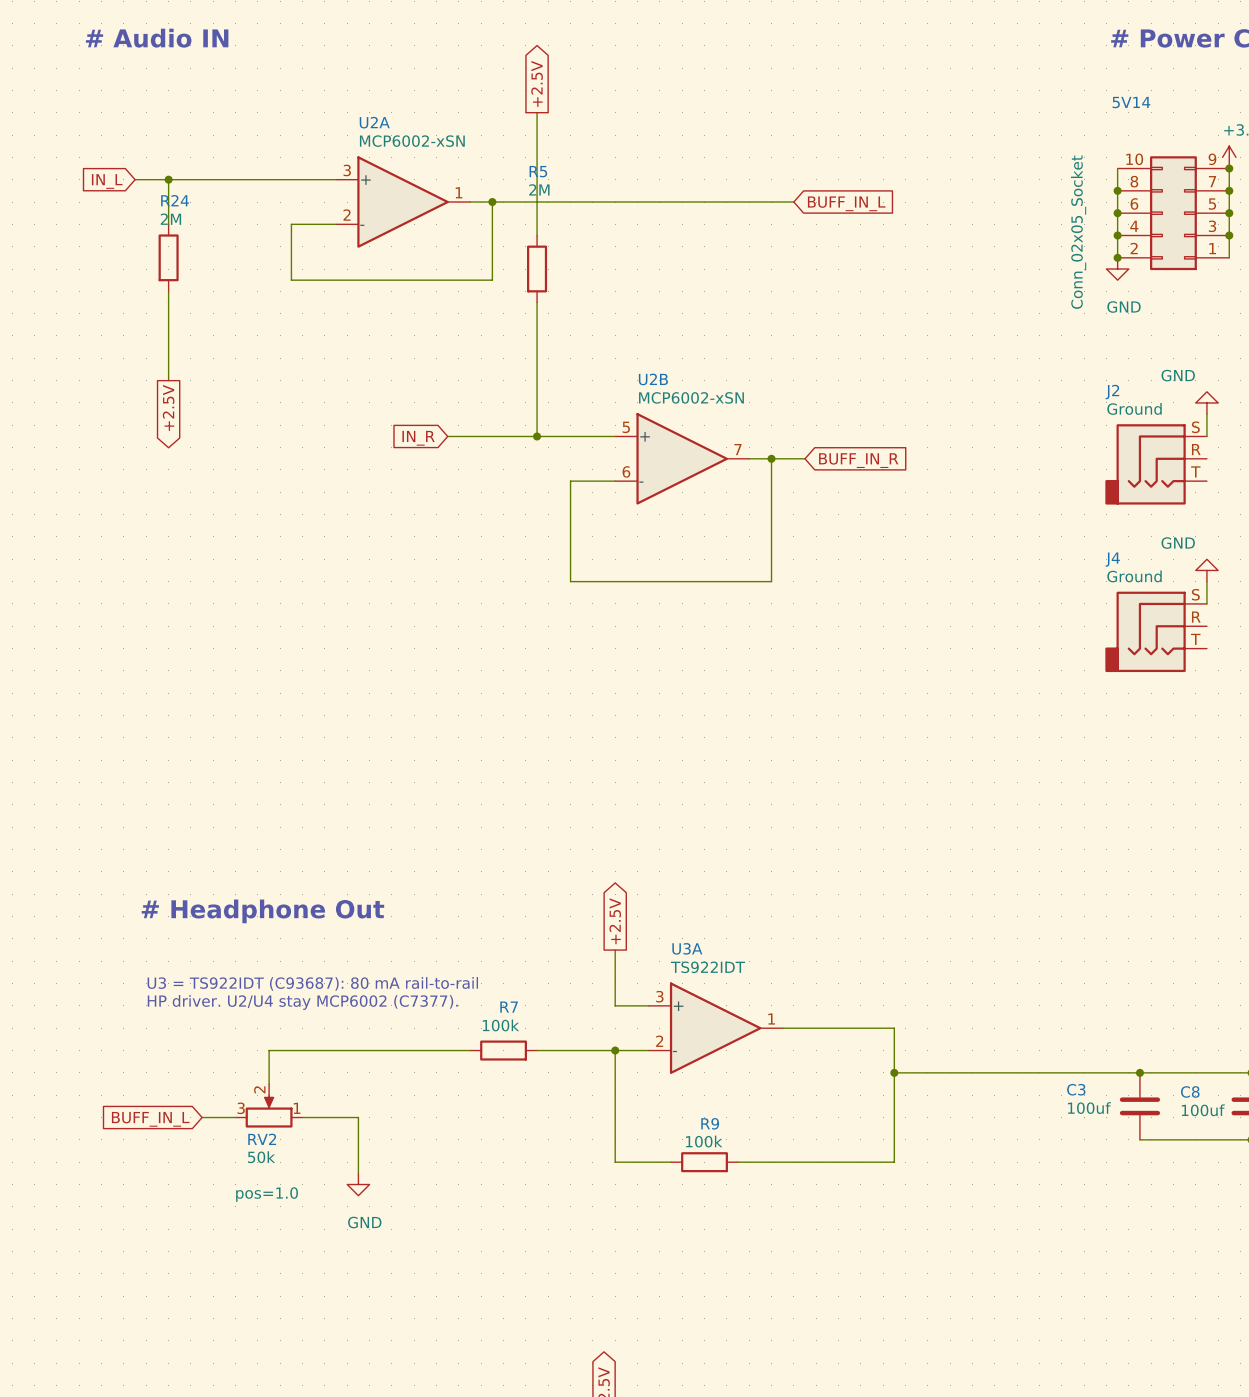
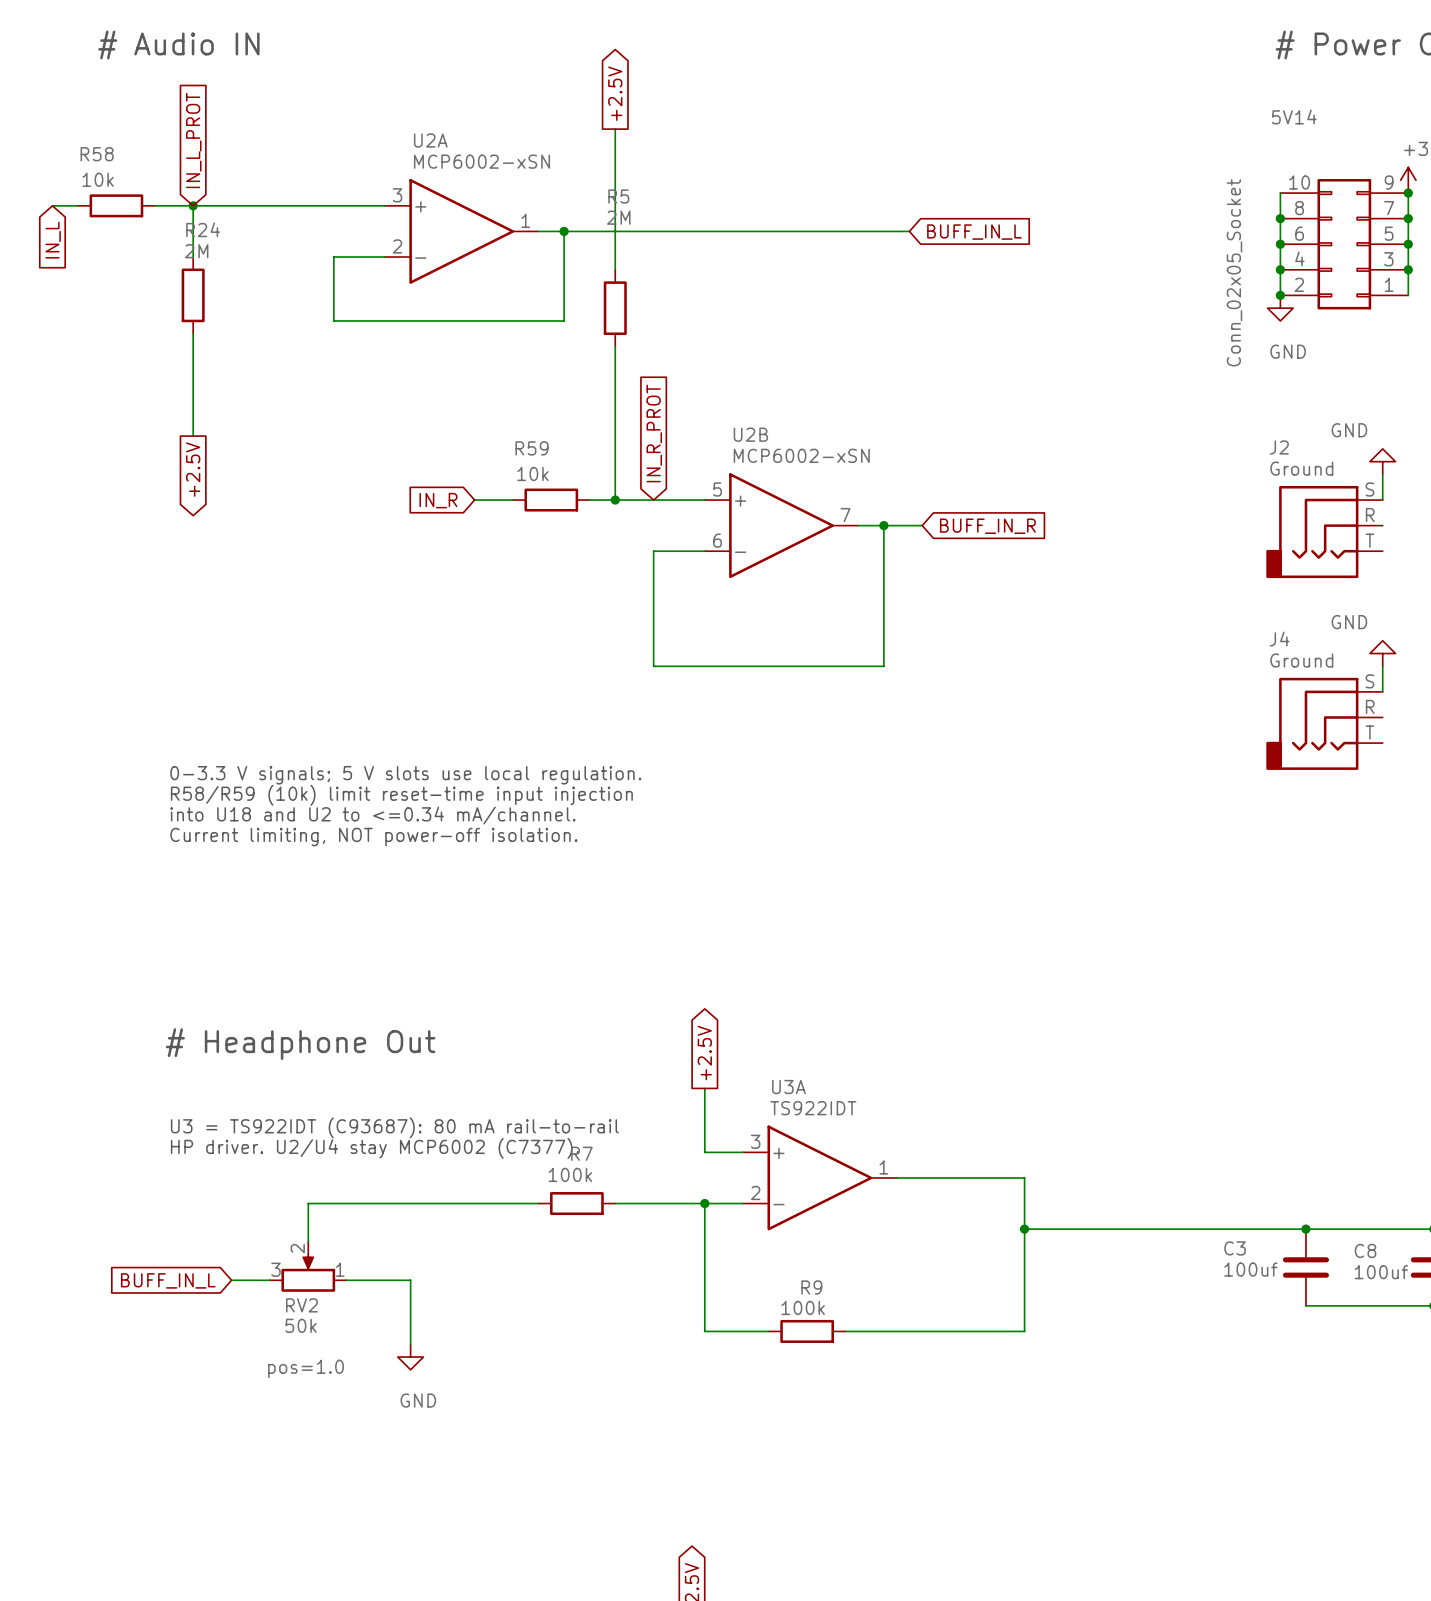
global label: none -> IN_L_PROT (193, 140)
wire: none -> (52, 205) (78, 205)
R58: none -> 10k (116, 205)
global label rotation: 0° (107, 181) -> 90° counterclockwise (53, 240)
global label: none -> IN_R_PROT (654, 433)
wire: (447, 436) (514, 436) -> (512, 500) (474, 500)
R59: none -> 10k (551, 500)
global label position: IN_R (418, 438) -> IN_R (438, 500)
text: none -> 0-3.3 V signals; 5 V slots use local regulation. (405, 775)
text: none -> R58/R59 (10k) limit reset-time input injection (401, 795)
text: none -> into U18 and U2 to <=0.34 mA/channel. (372, 815)
text: none -> Current limiting, NOT power-off isolation. (373, 837)

